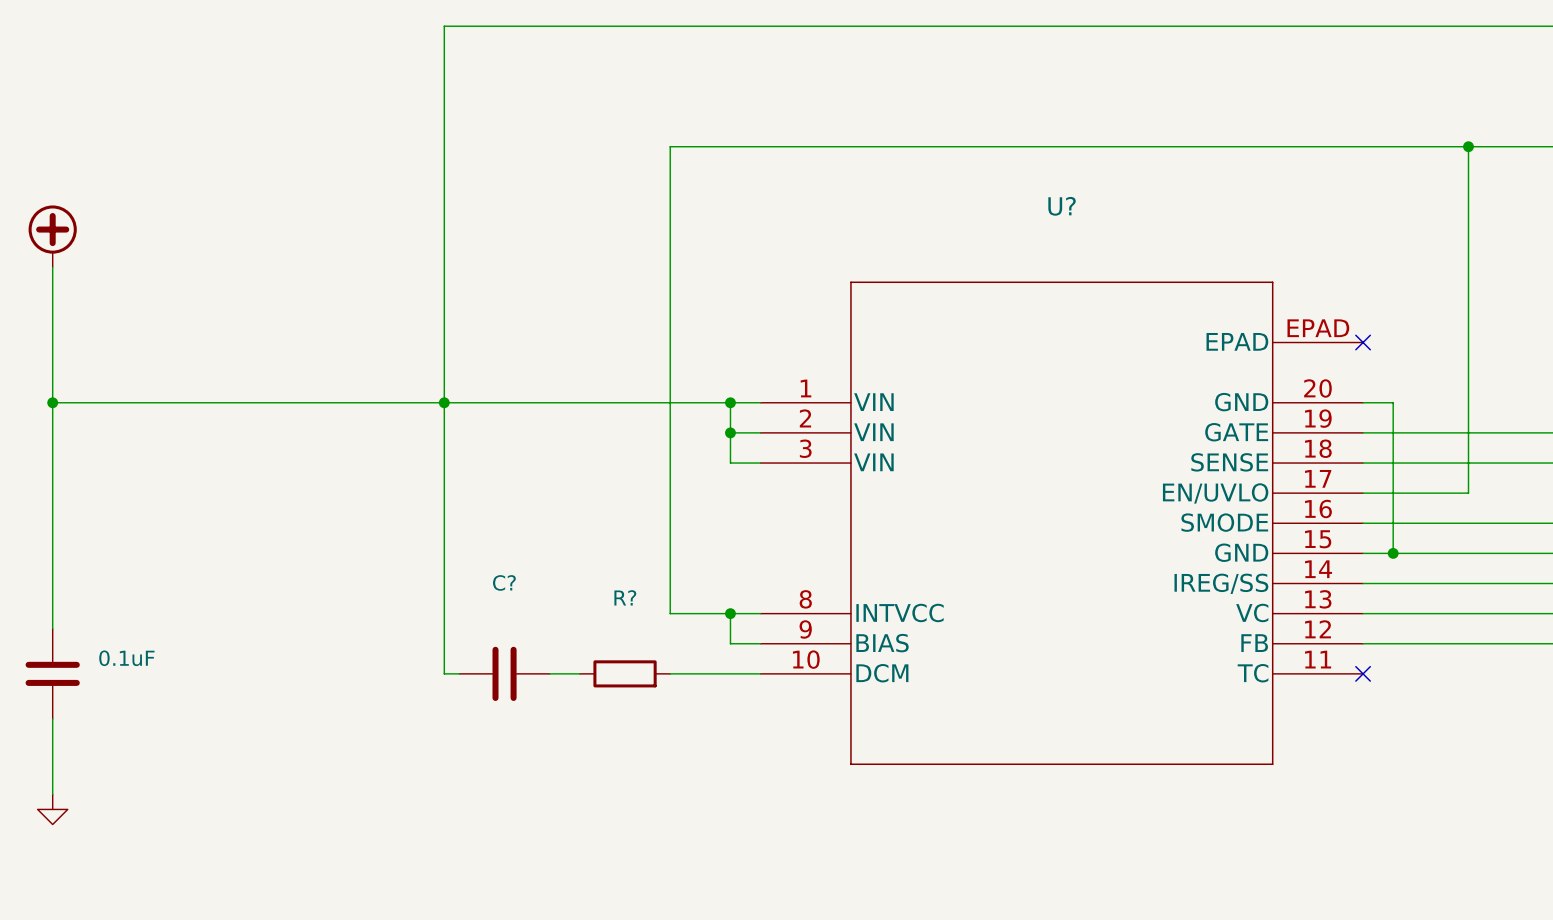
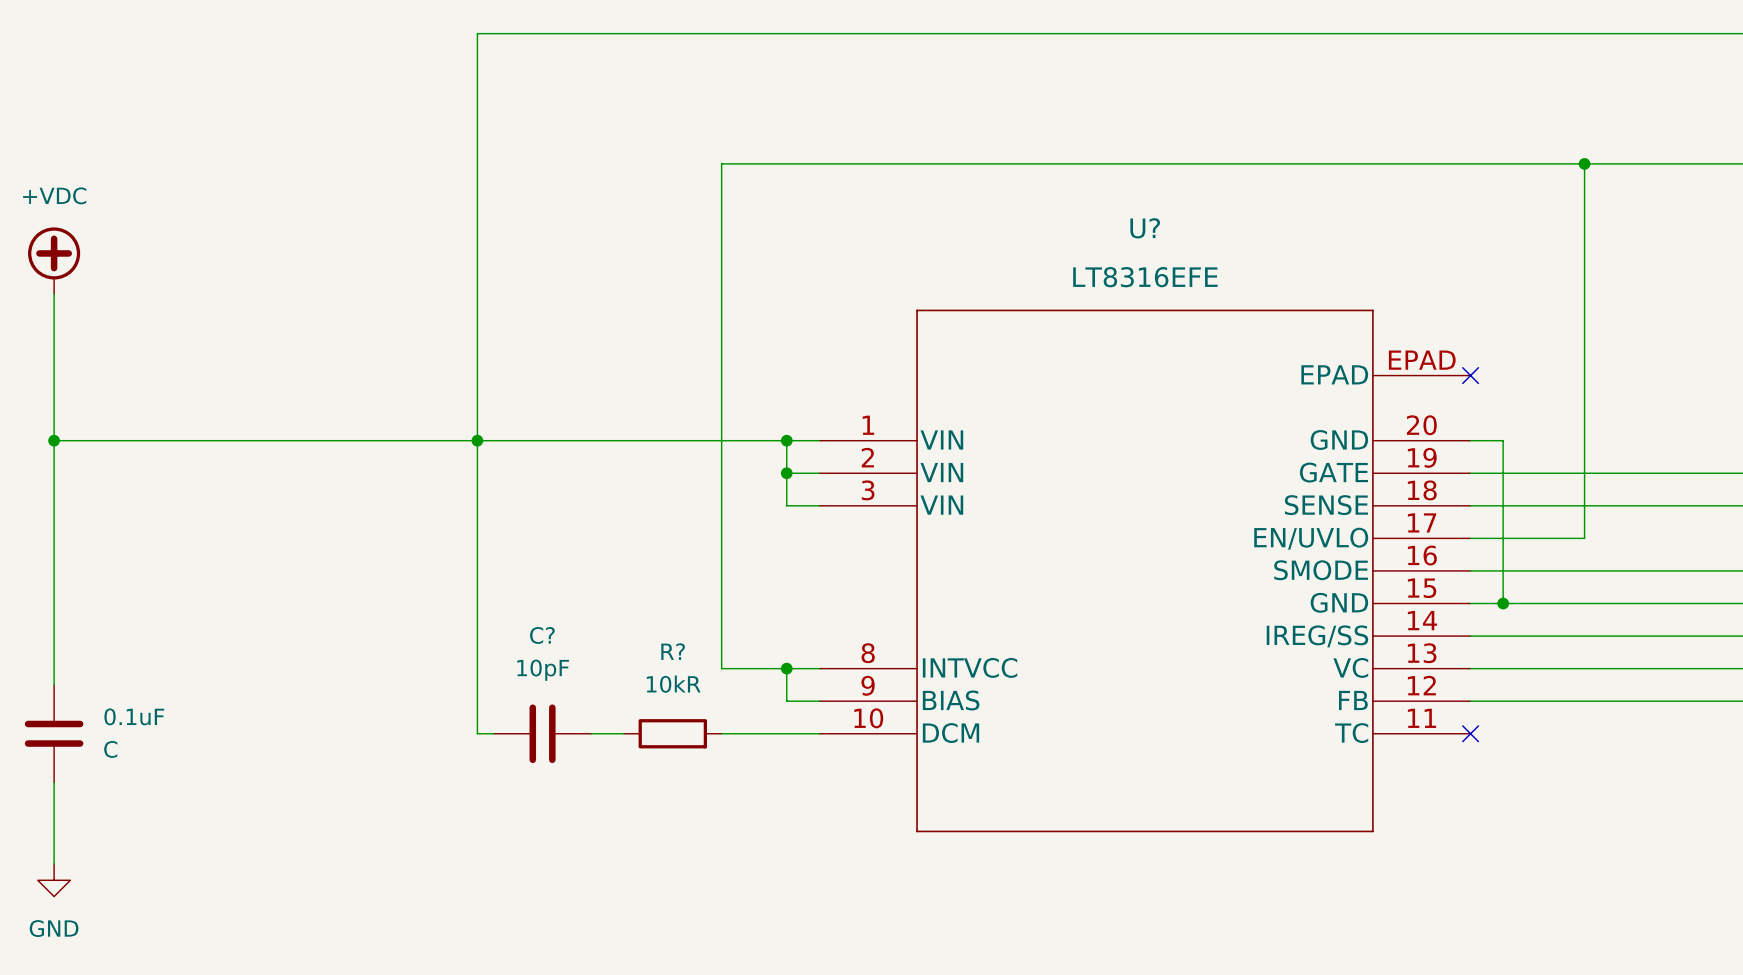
power symbol text: none -> +VDC (54, 195)
U? value: none -> LT8316EFE (1145, 277)
C? value: none -> 10pF (543, 670)
R? value: none -> 10kR (673, 684)
0.1uF value: none -> C (110, 749)
power symbol text: none -> GND (54, 928)

